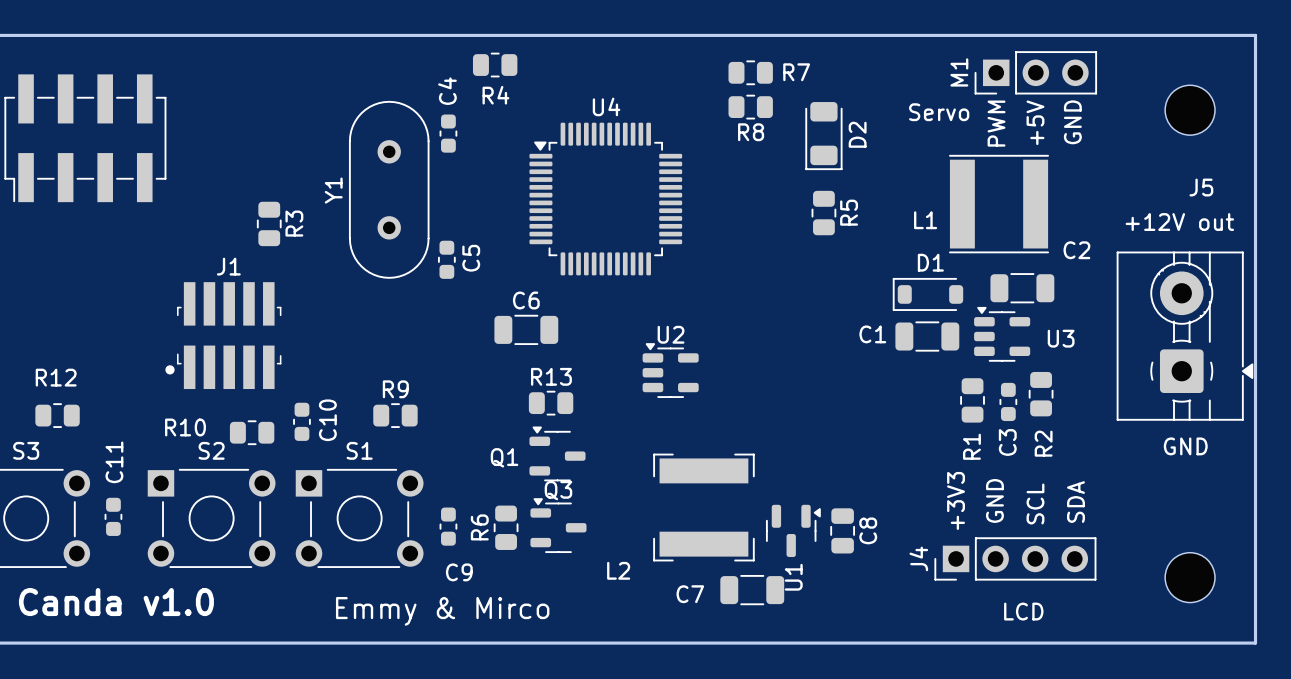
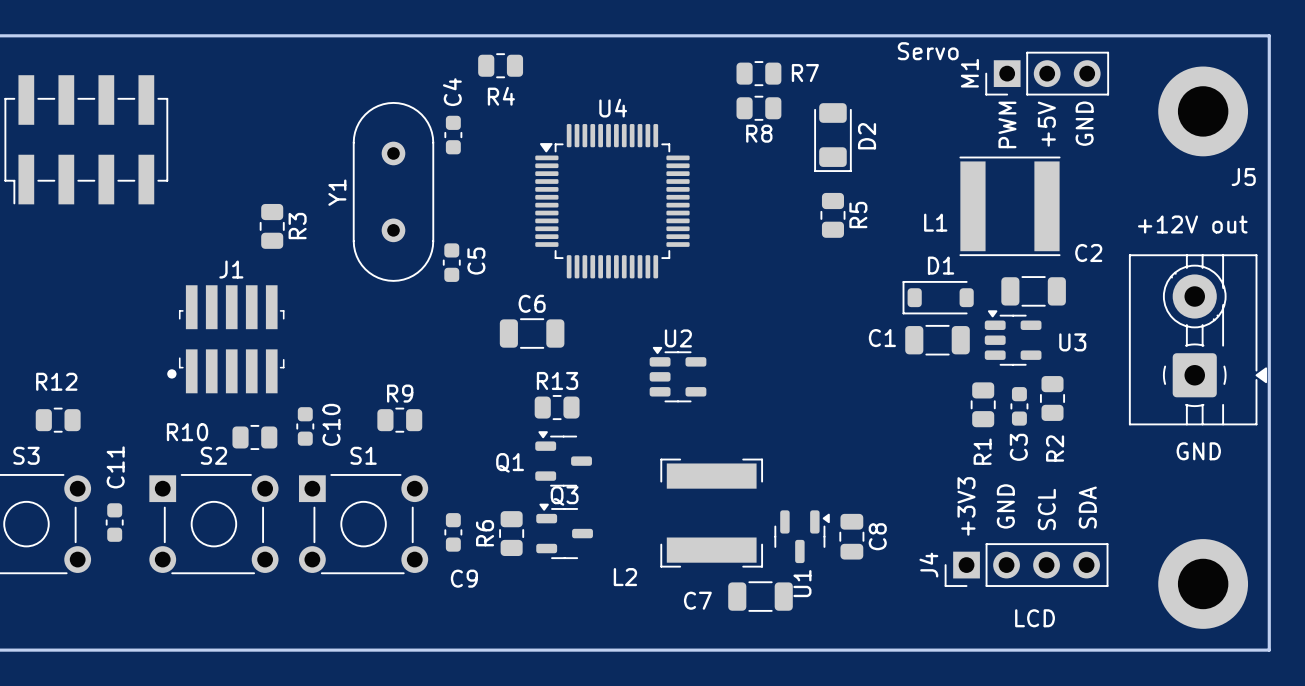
part footprint: [1165, 85, 1216, 136] -> [1158, 66, 1249, 157]
text position: Servo (939, 112) -> Servo (928, 51)
J5 name position: J5 (1201, 187) -> J5 (1243, 176)
part footprint: [1165, 552, 1216, 603] -> [1158, 539, 1249, 629]
text: Canda v1.0 (116, 602) -> none
text: Emmy & Mirco (442, 611) -> none

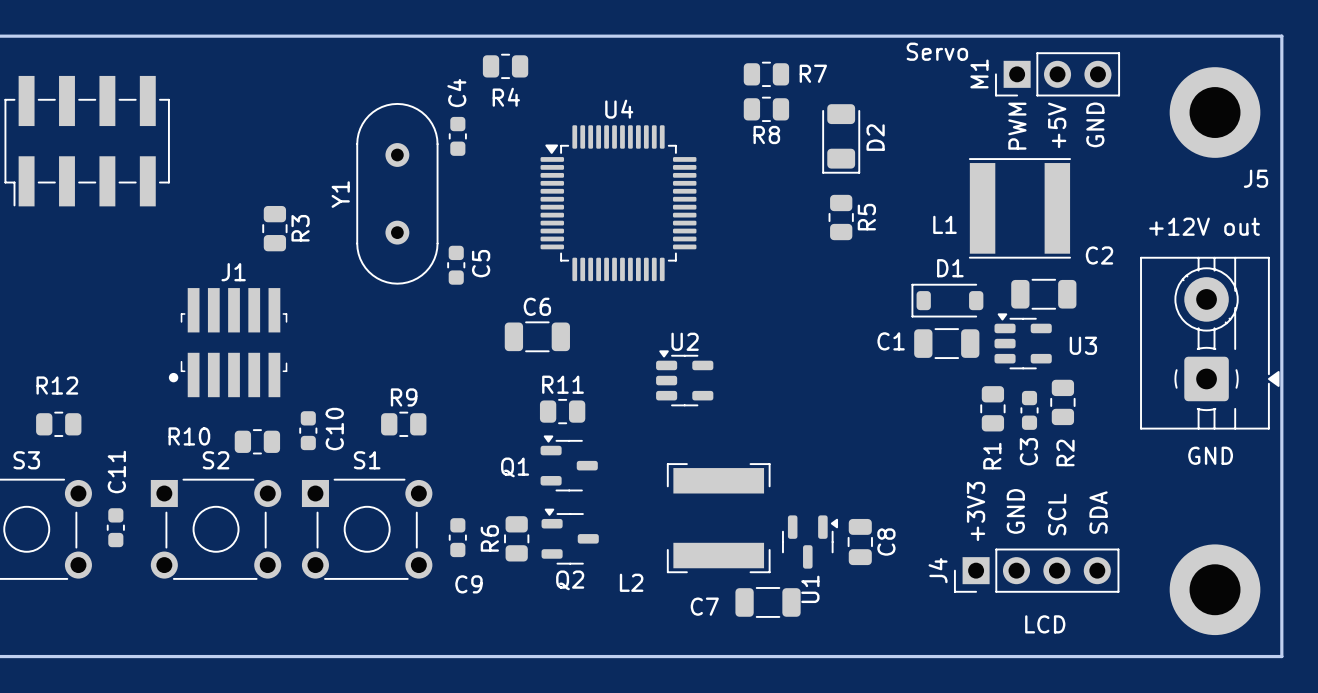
R13 name: R13 (557, 380) -> R11 (563, 384)
Q3 name: Q3 (564, 495) -> Q2 (570, 580)

